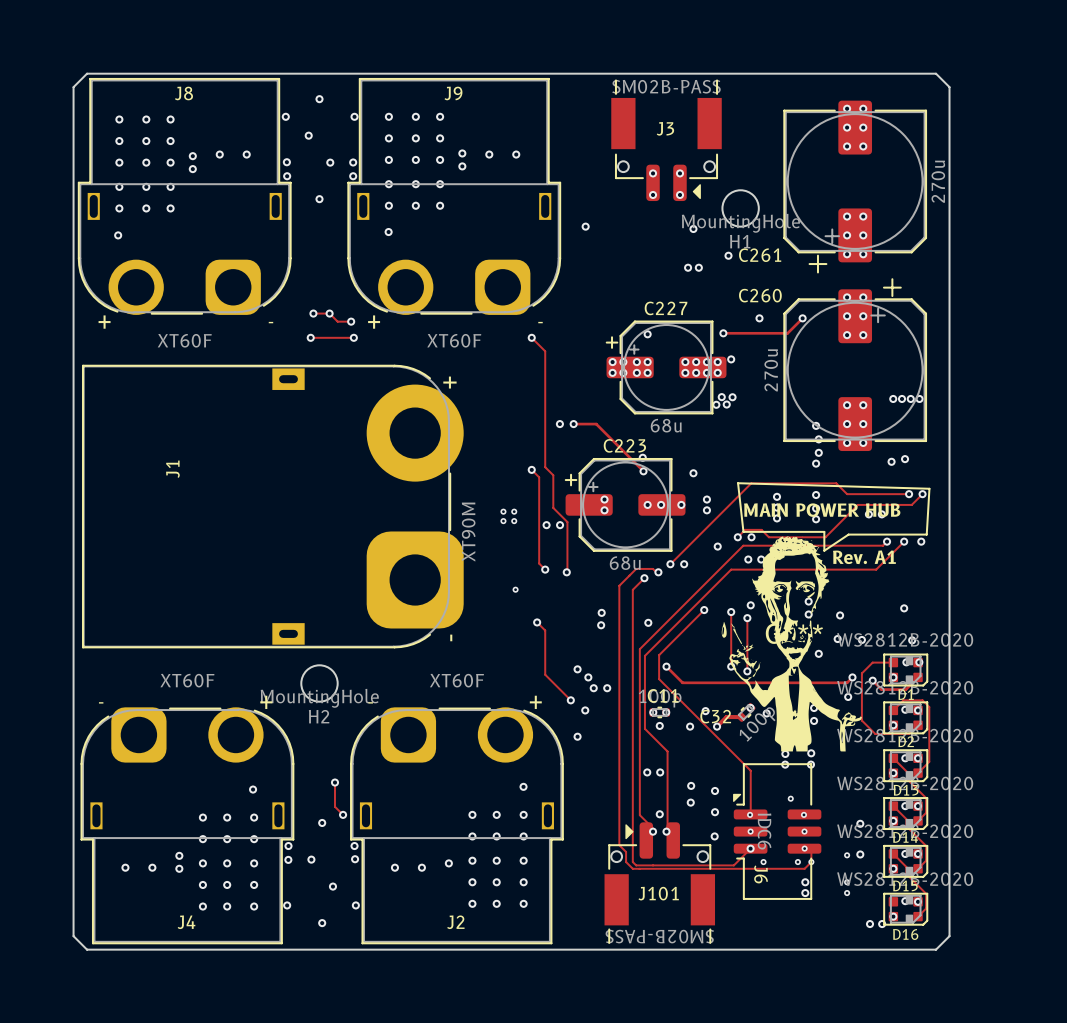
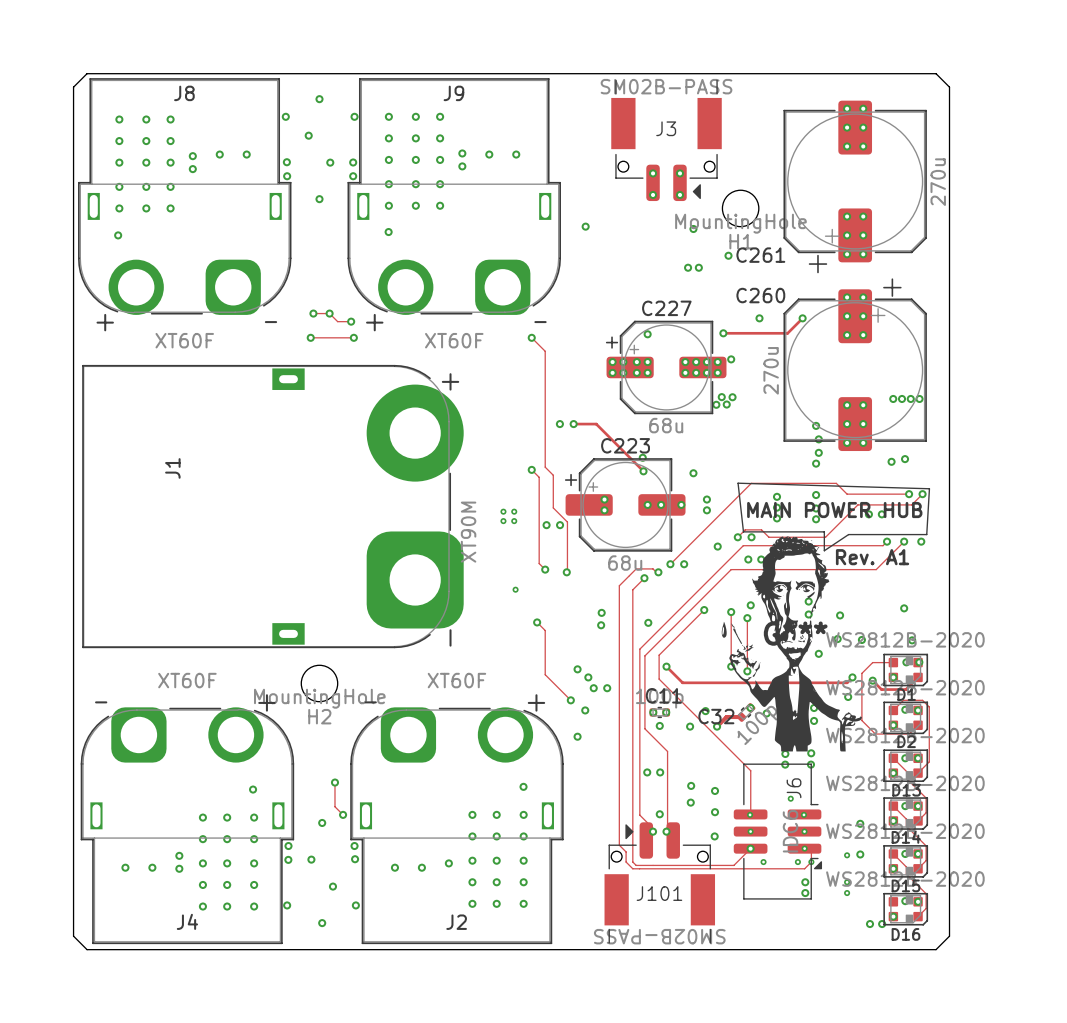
J6 rotation: 0° (777, 831) -> 180° (777, 831)

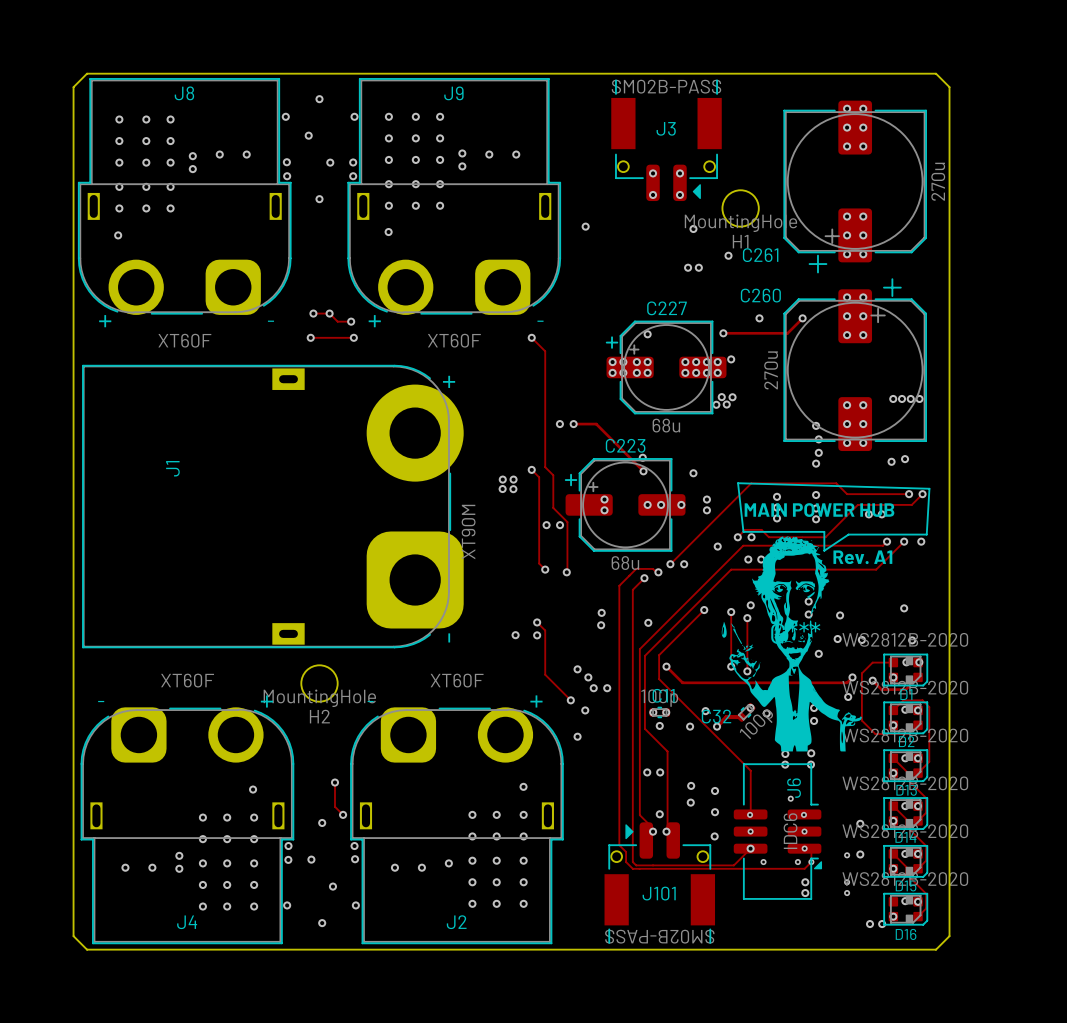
via: none -> (502, 479)
via: none -> (513, 479)
via: none -> (502, 489)
via: none -> (513, 489)
via: (503, 511) -> none
via: (514, 511) -> none
via: (503, 521) -> none
via: (514, 521) -> none
via: (515, 589) -> none
via: none -> (515, 635)
via: none -> (537, 635)

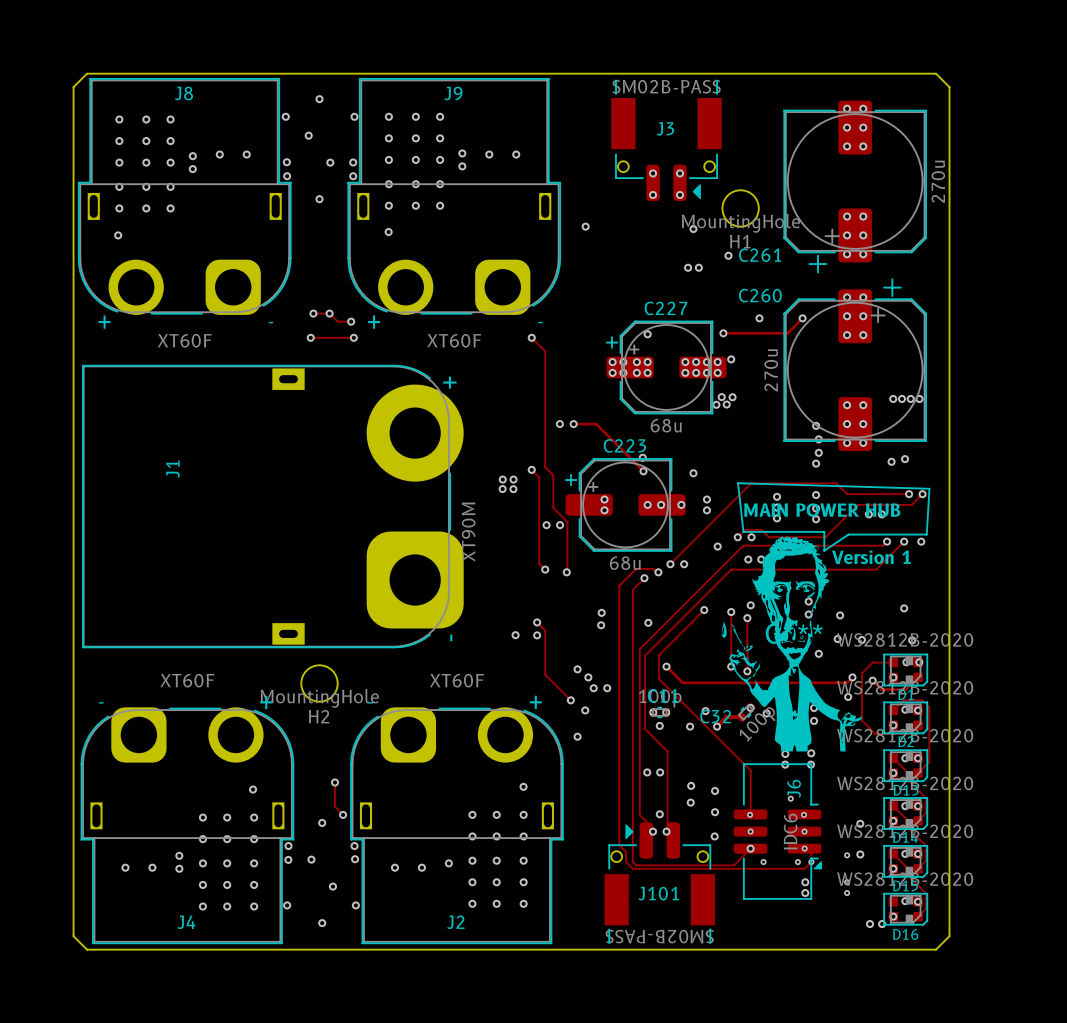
text: Rev. A1 (862, 557) -> Version 1 (871, 557)

